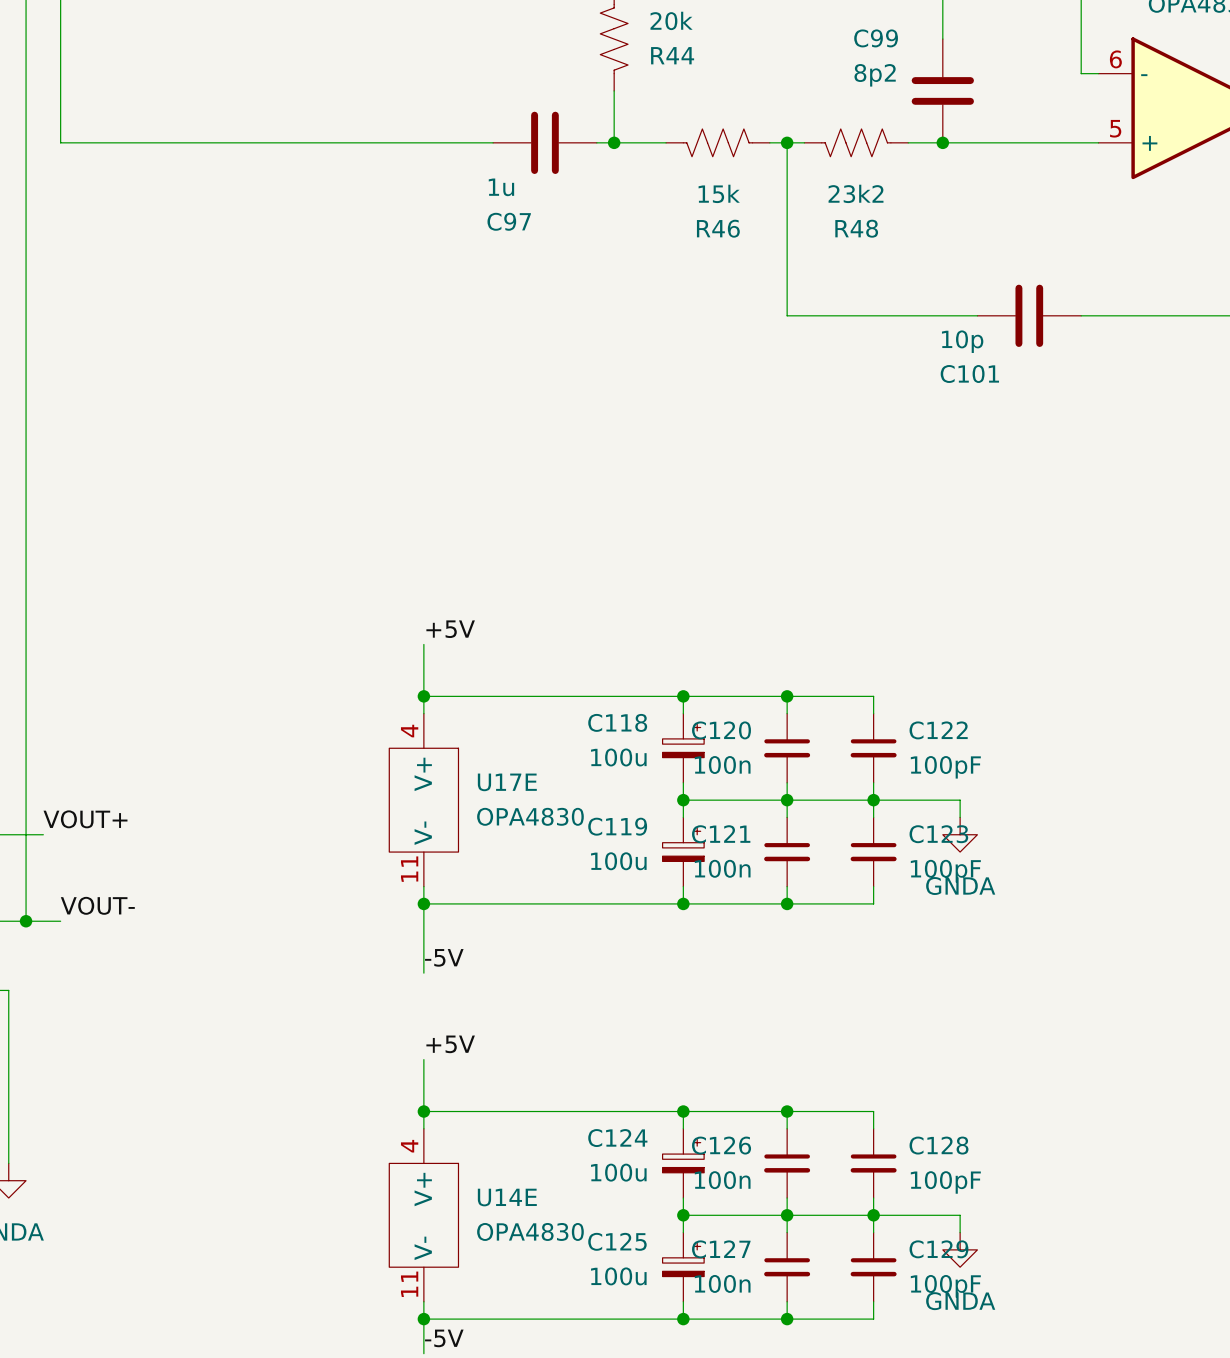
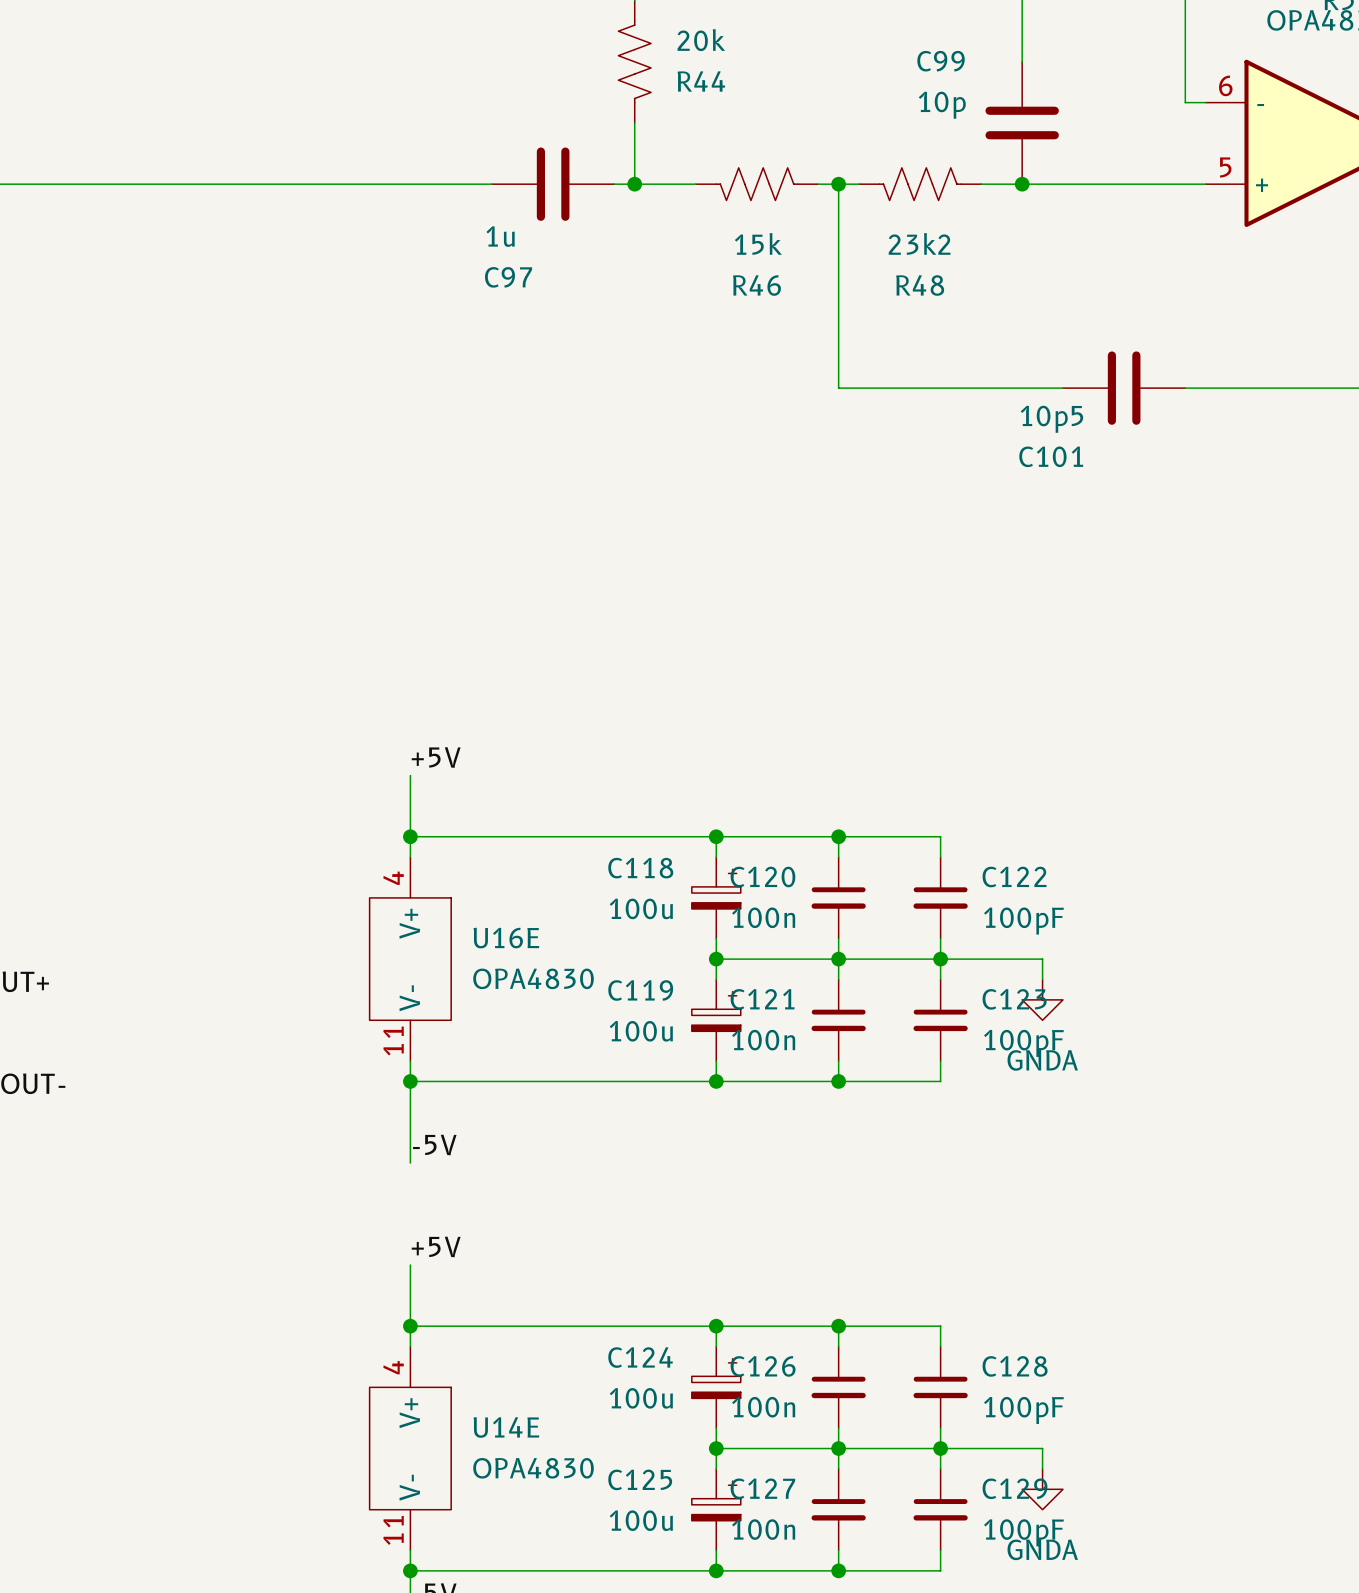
C99 value: 8p2 (875, 75) -> 10p (942, 105)
C101 value: 10p (962, 341) -> 10p5 (1051, 419)
U17E name: U17E (507, 782) -> U16E (506, 938)

